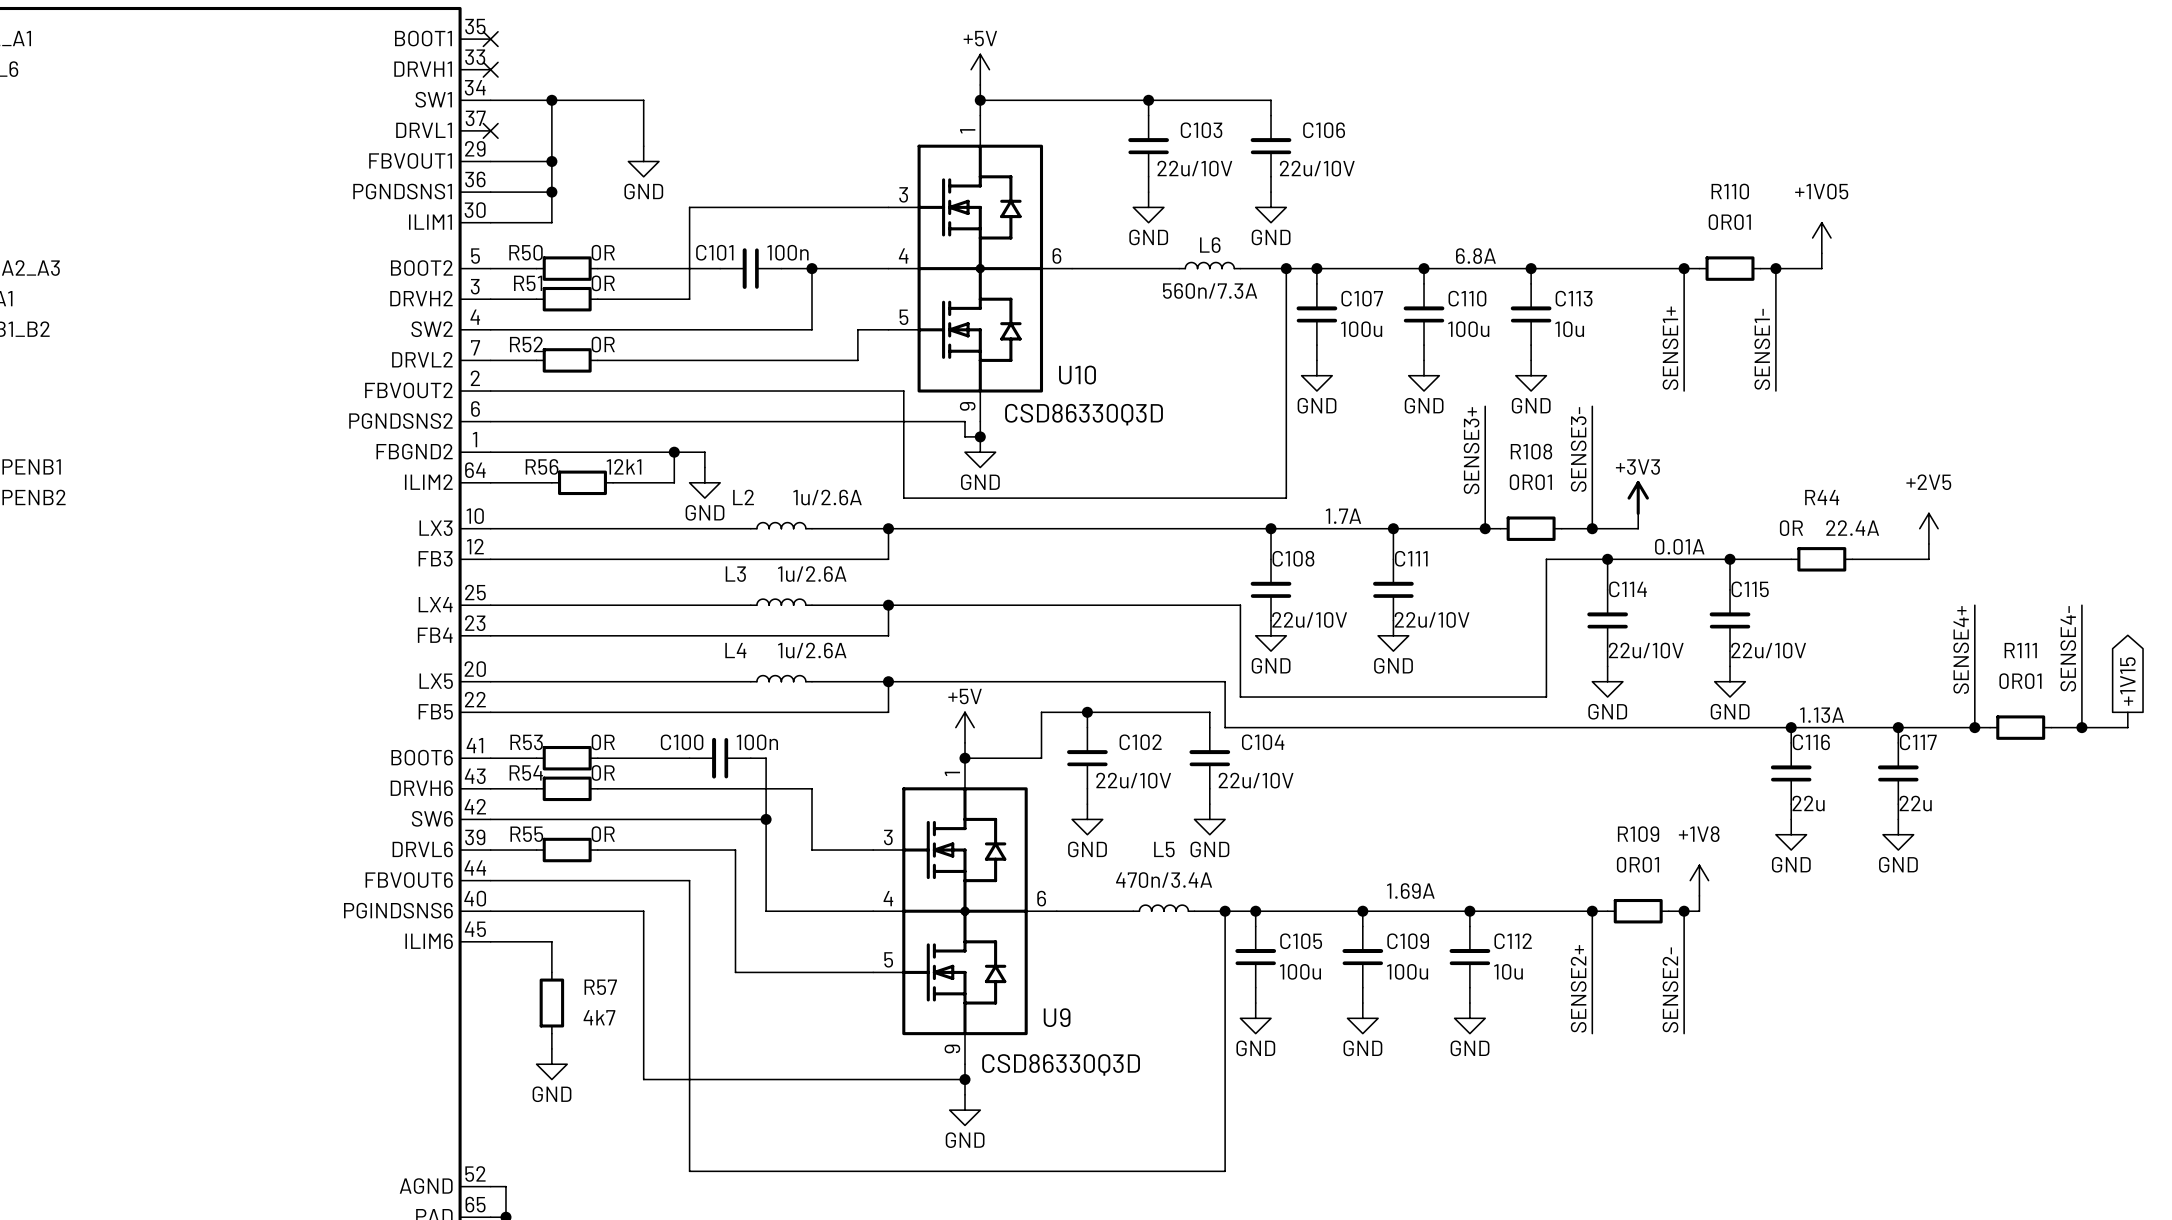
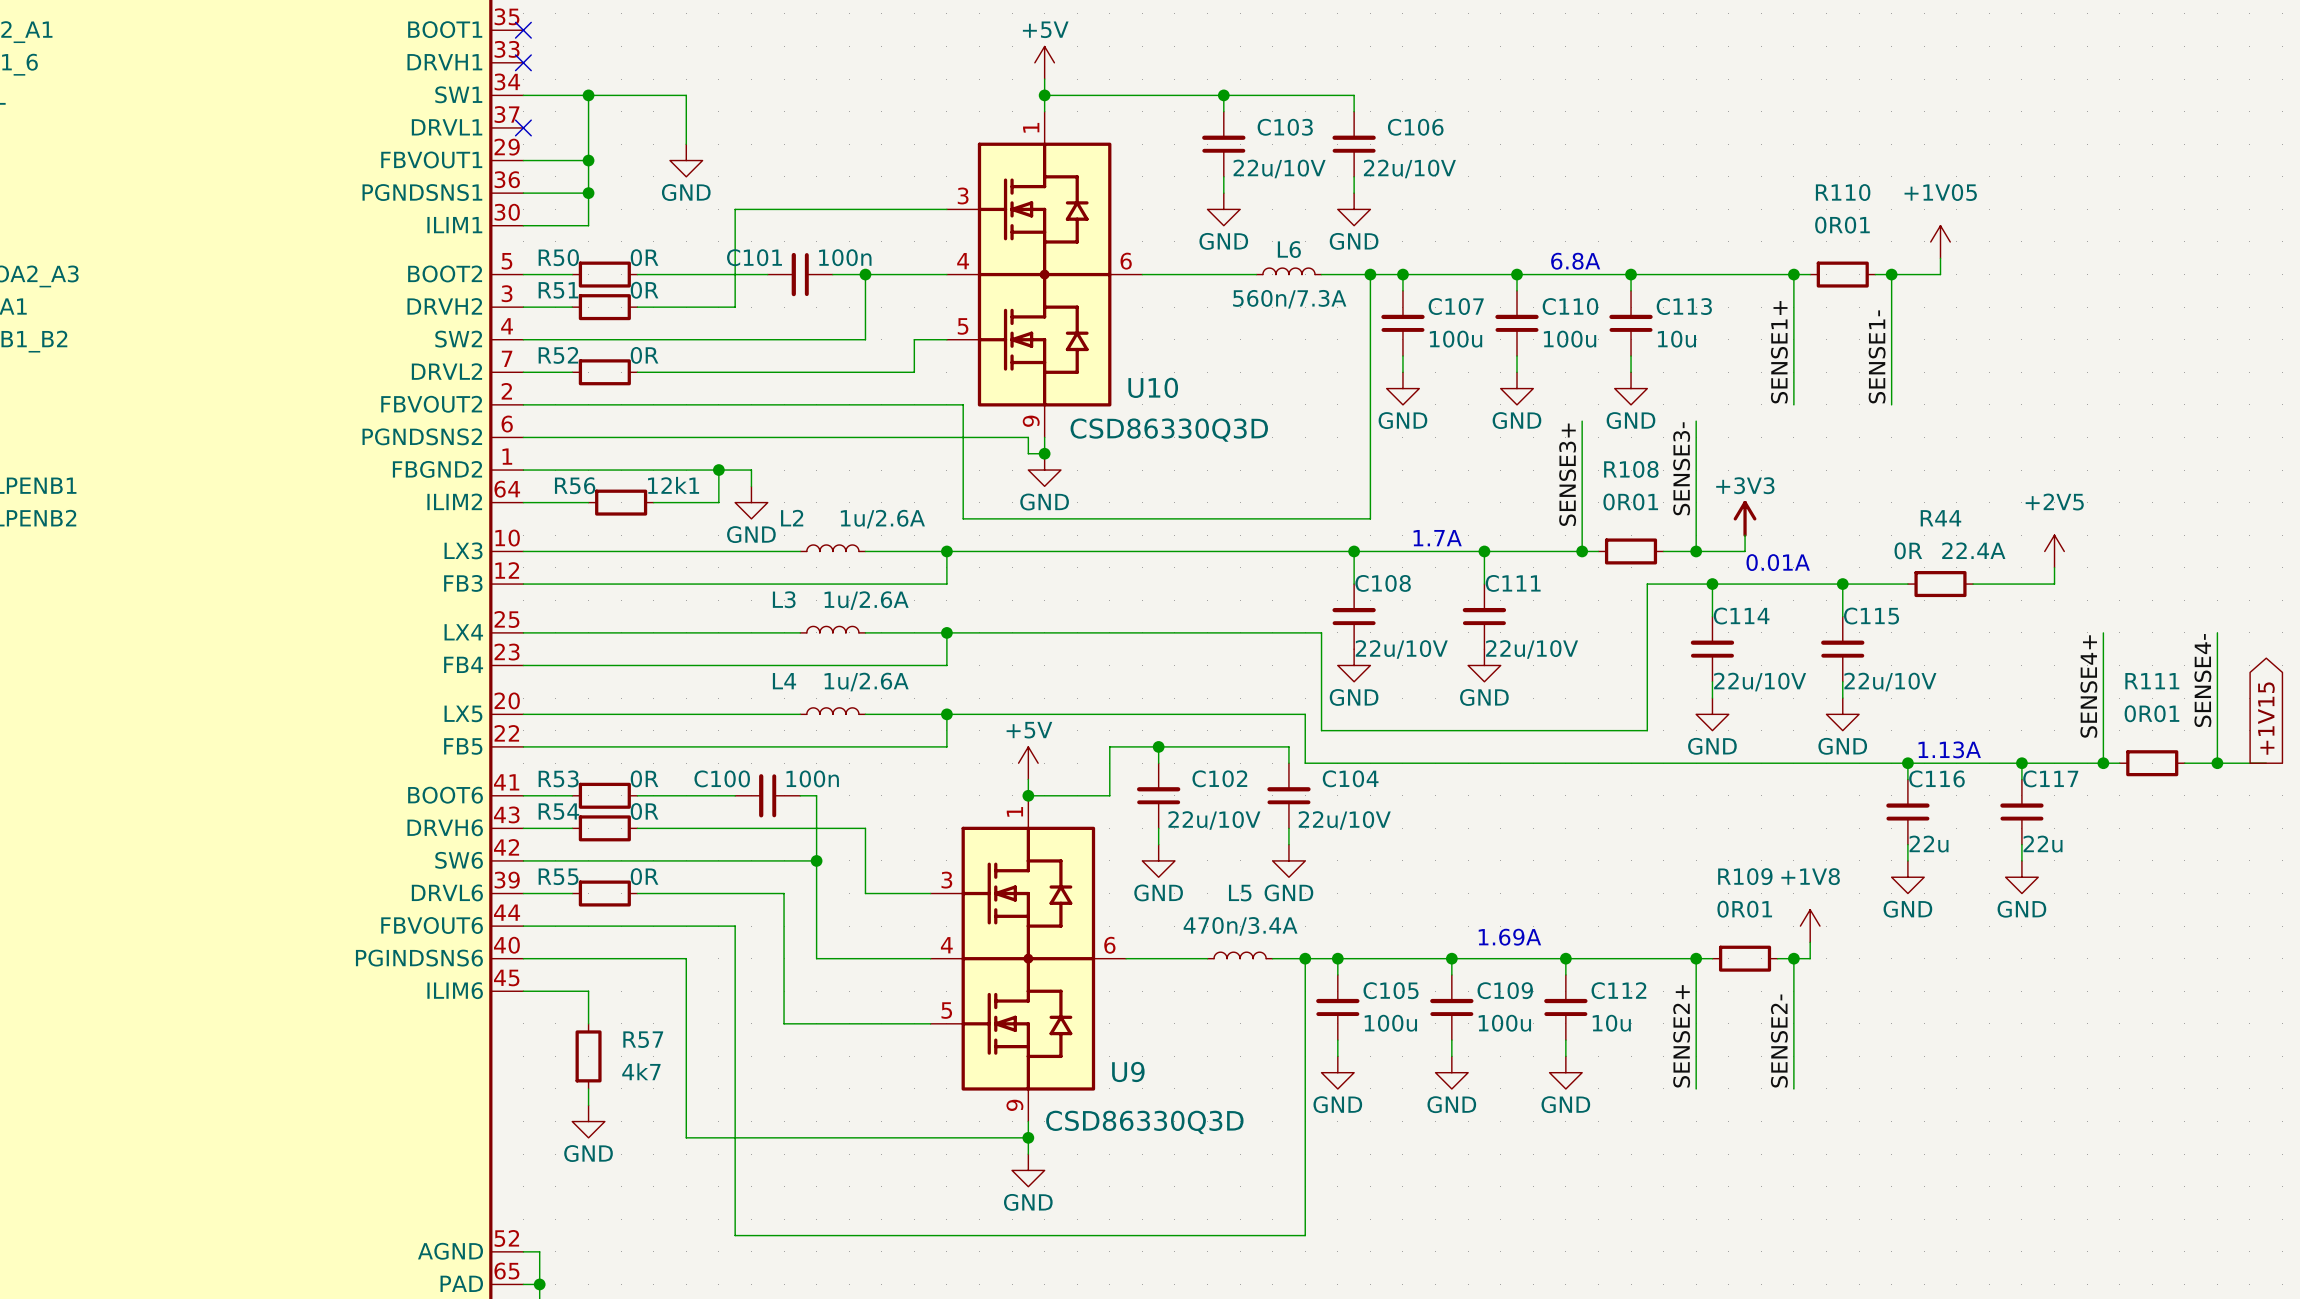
text position: 0.01A (1679, 546) -> 0.01A (1778, 562)
global label position: +1V15 (2127, 681) -> +1V15 (2266, 718)
wire: (2127, 712) (2127, 727) -> none

